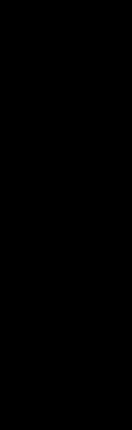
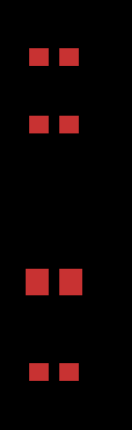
part: none -> (53, 57)
part: none -> (53, 124)
part: none -> (53, 282)
part: none -> (53, 372)

